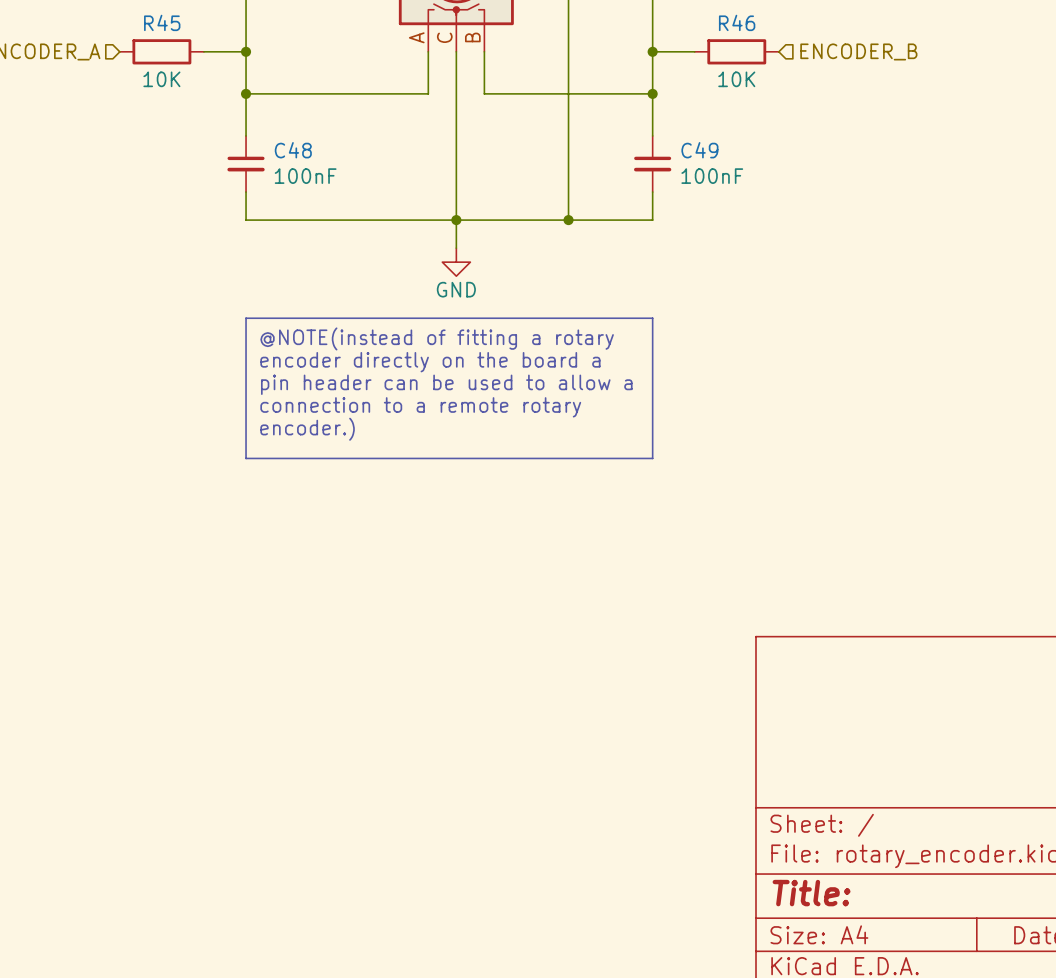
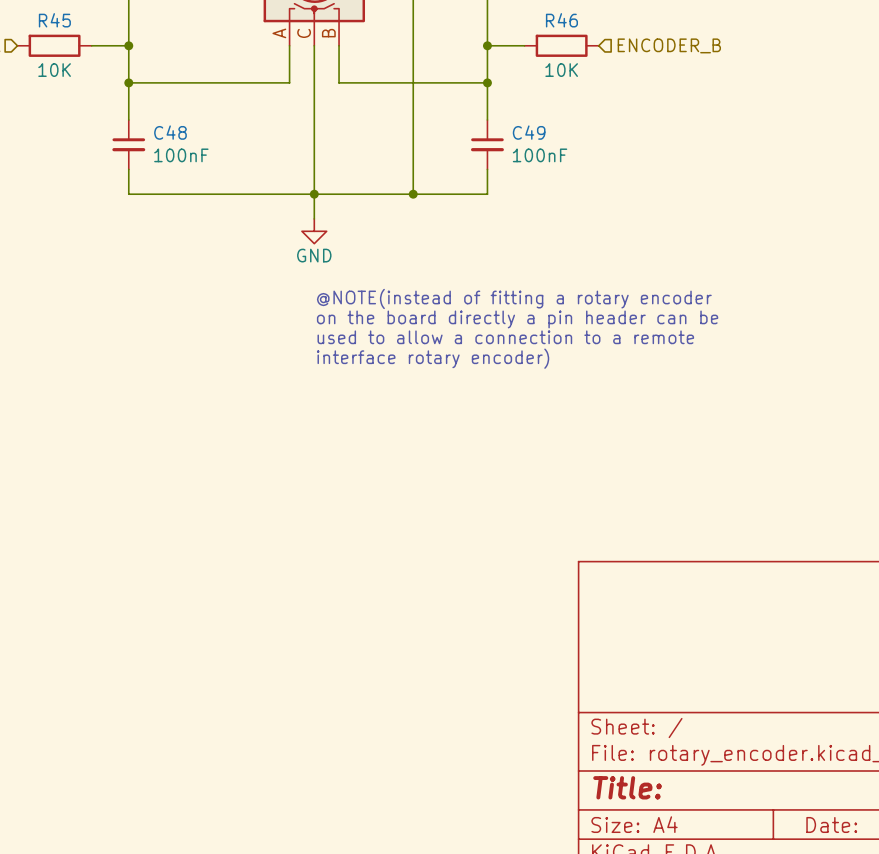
line: (246, 318) (652, 318) (652, 458) (246, 458) (246, 318) -> none
text: @NOTE(instead of fitting a rotary (437, 338) -> @NOTE(instead of fitting a rotary encoder (514, 298)
text: encoder directly on the board a (430, 362) -> none
text: none -> on the board directly a pin header can be (517, 319)
text: pin header can be used to allow a (446, 384) -> none
text: none -> interface rotary encoder) (433, 358)
text: connection to a remote rotary (420, 407) -> used to allow a connection to a remote (505, 337)
text: encoder.) (307, 429) -> none

